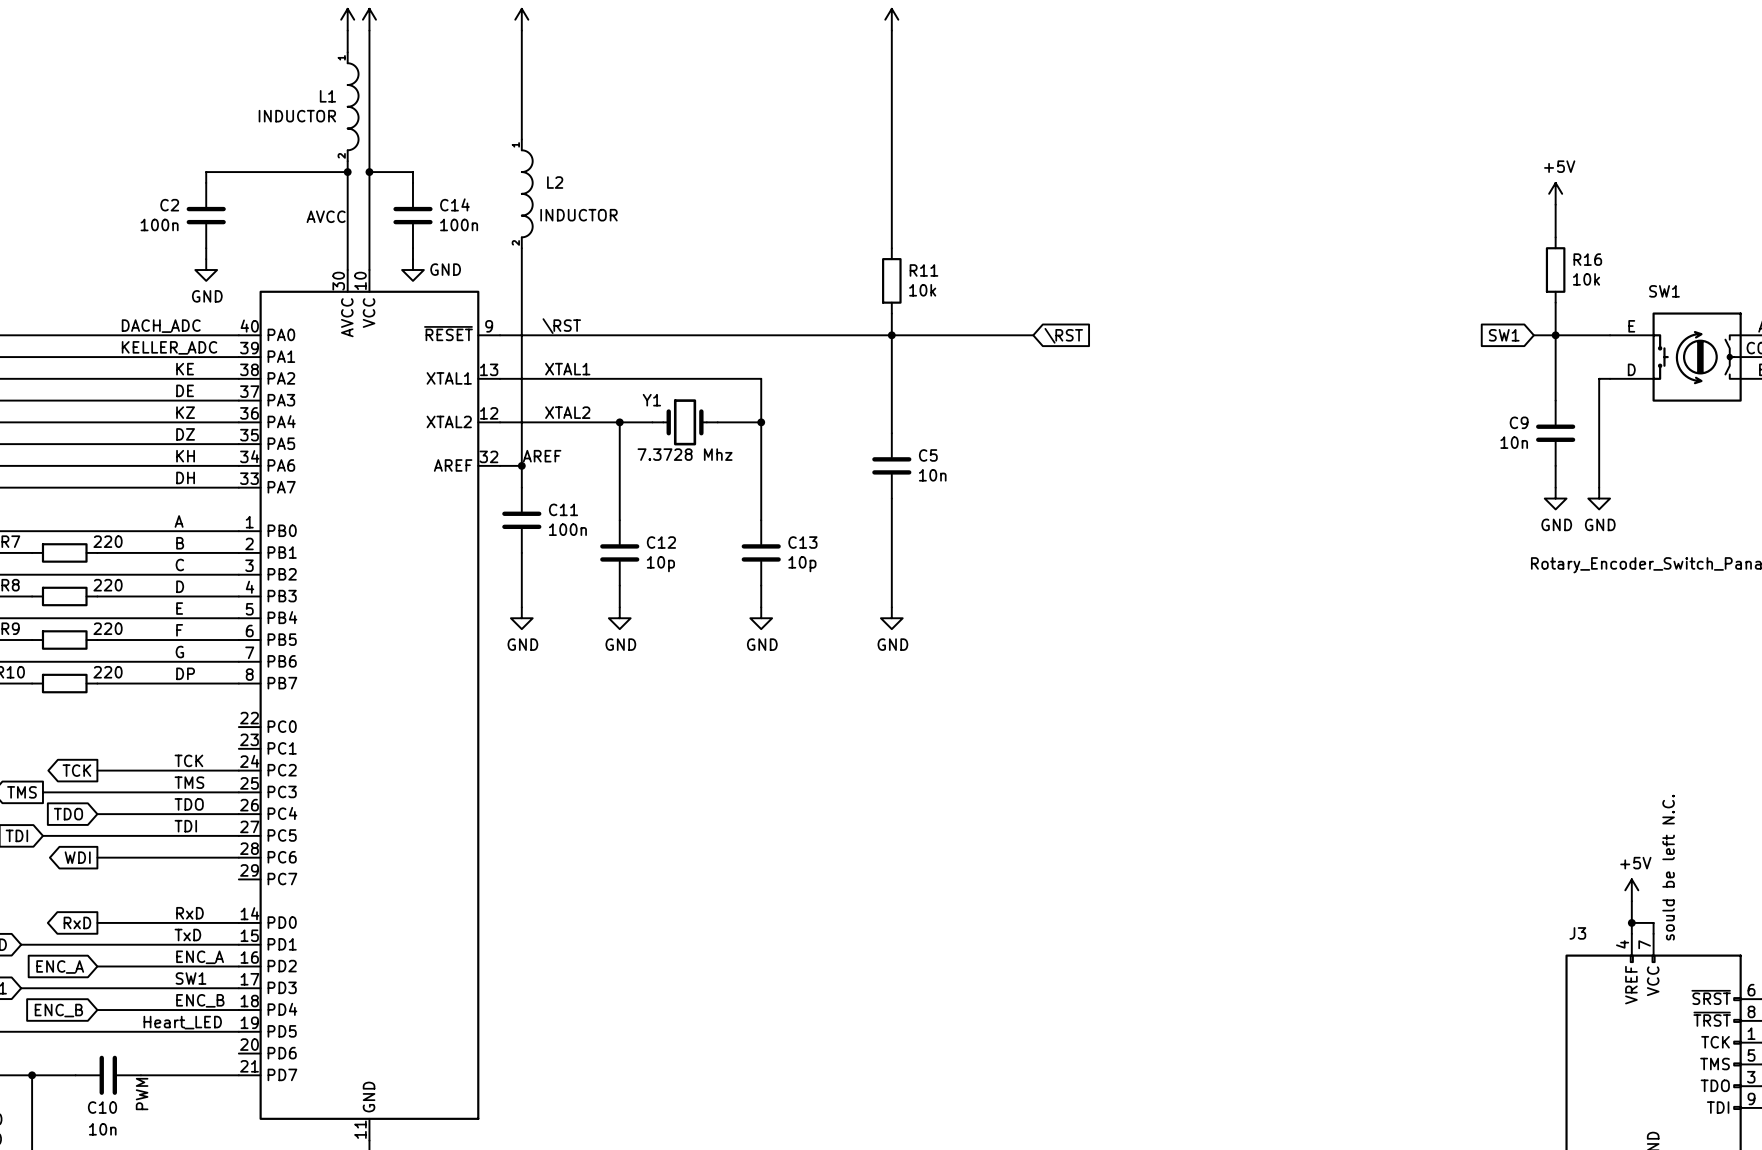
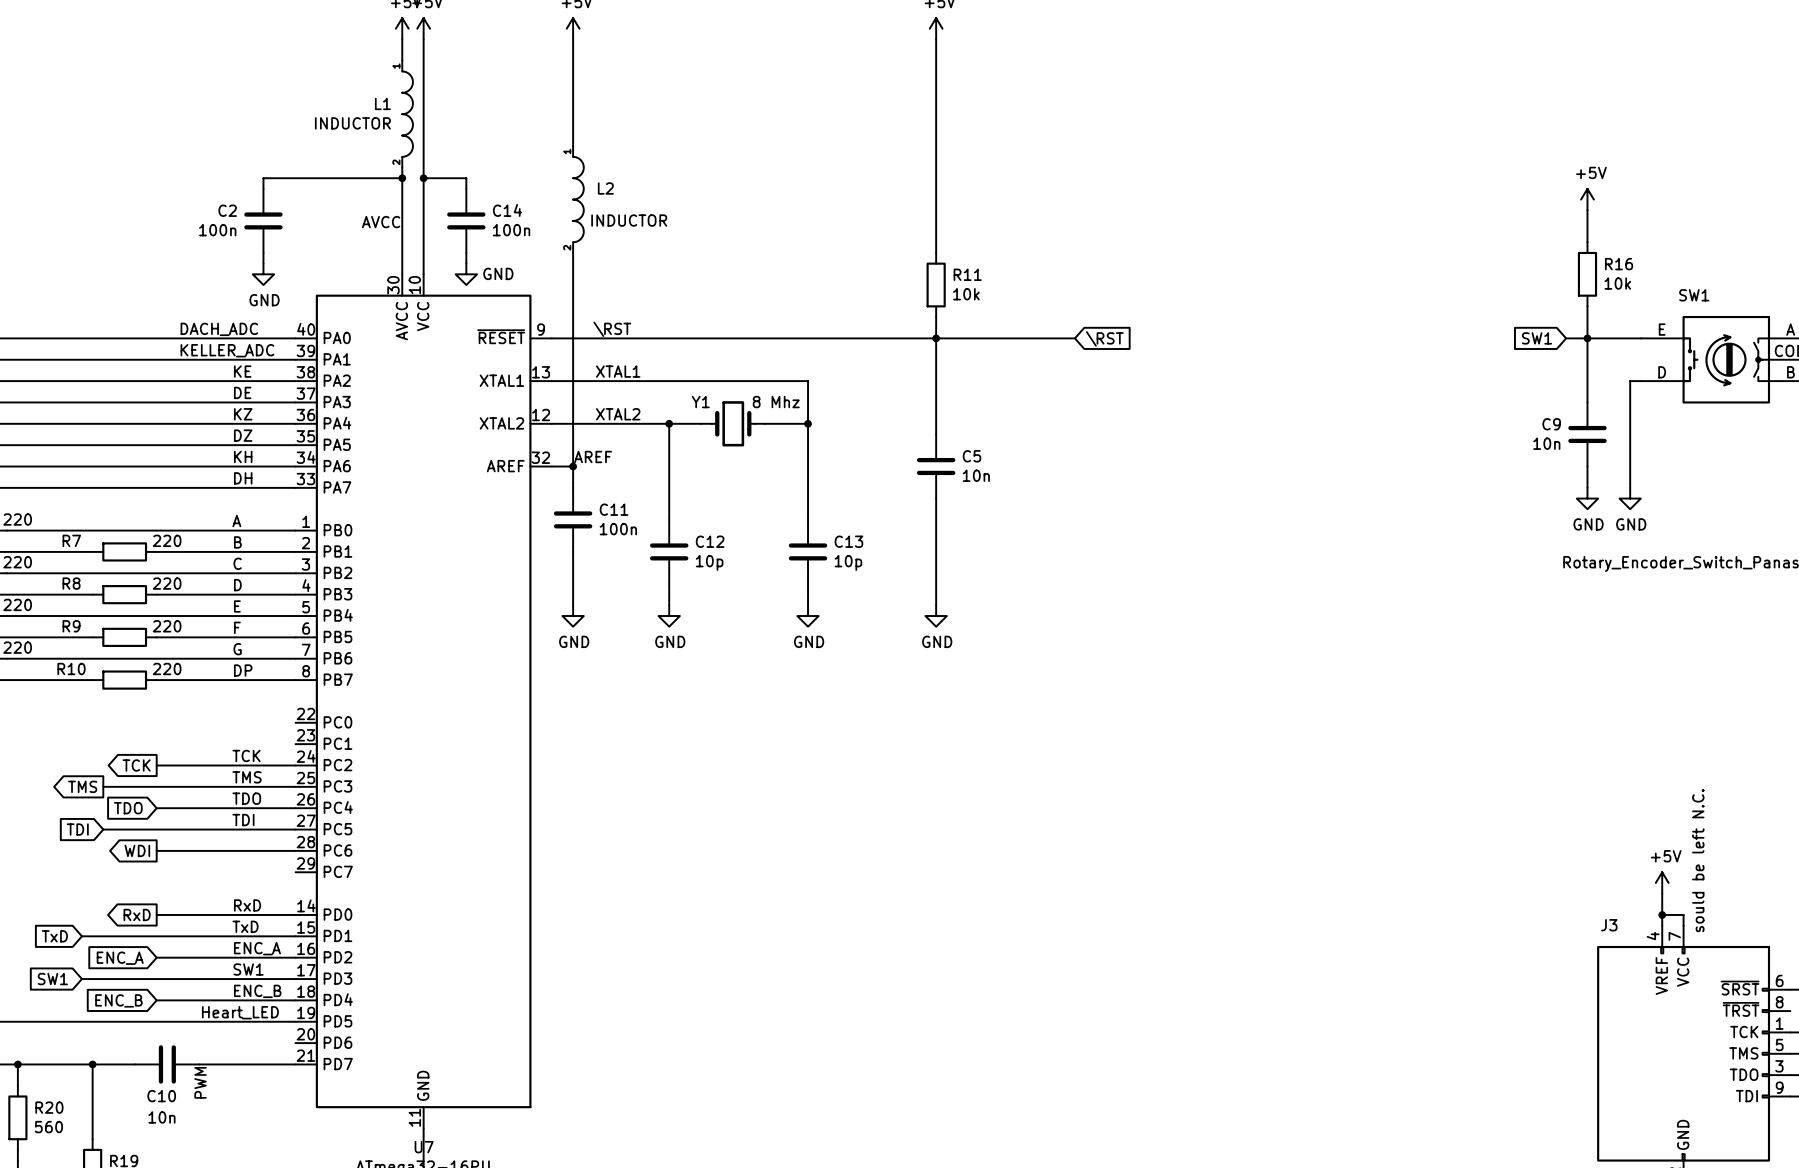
Y1 value: 7.3728 Mhz (685, 454) -> 8 Mhz (776, 402)

